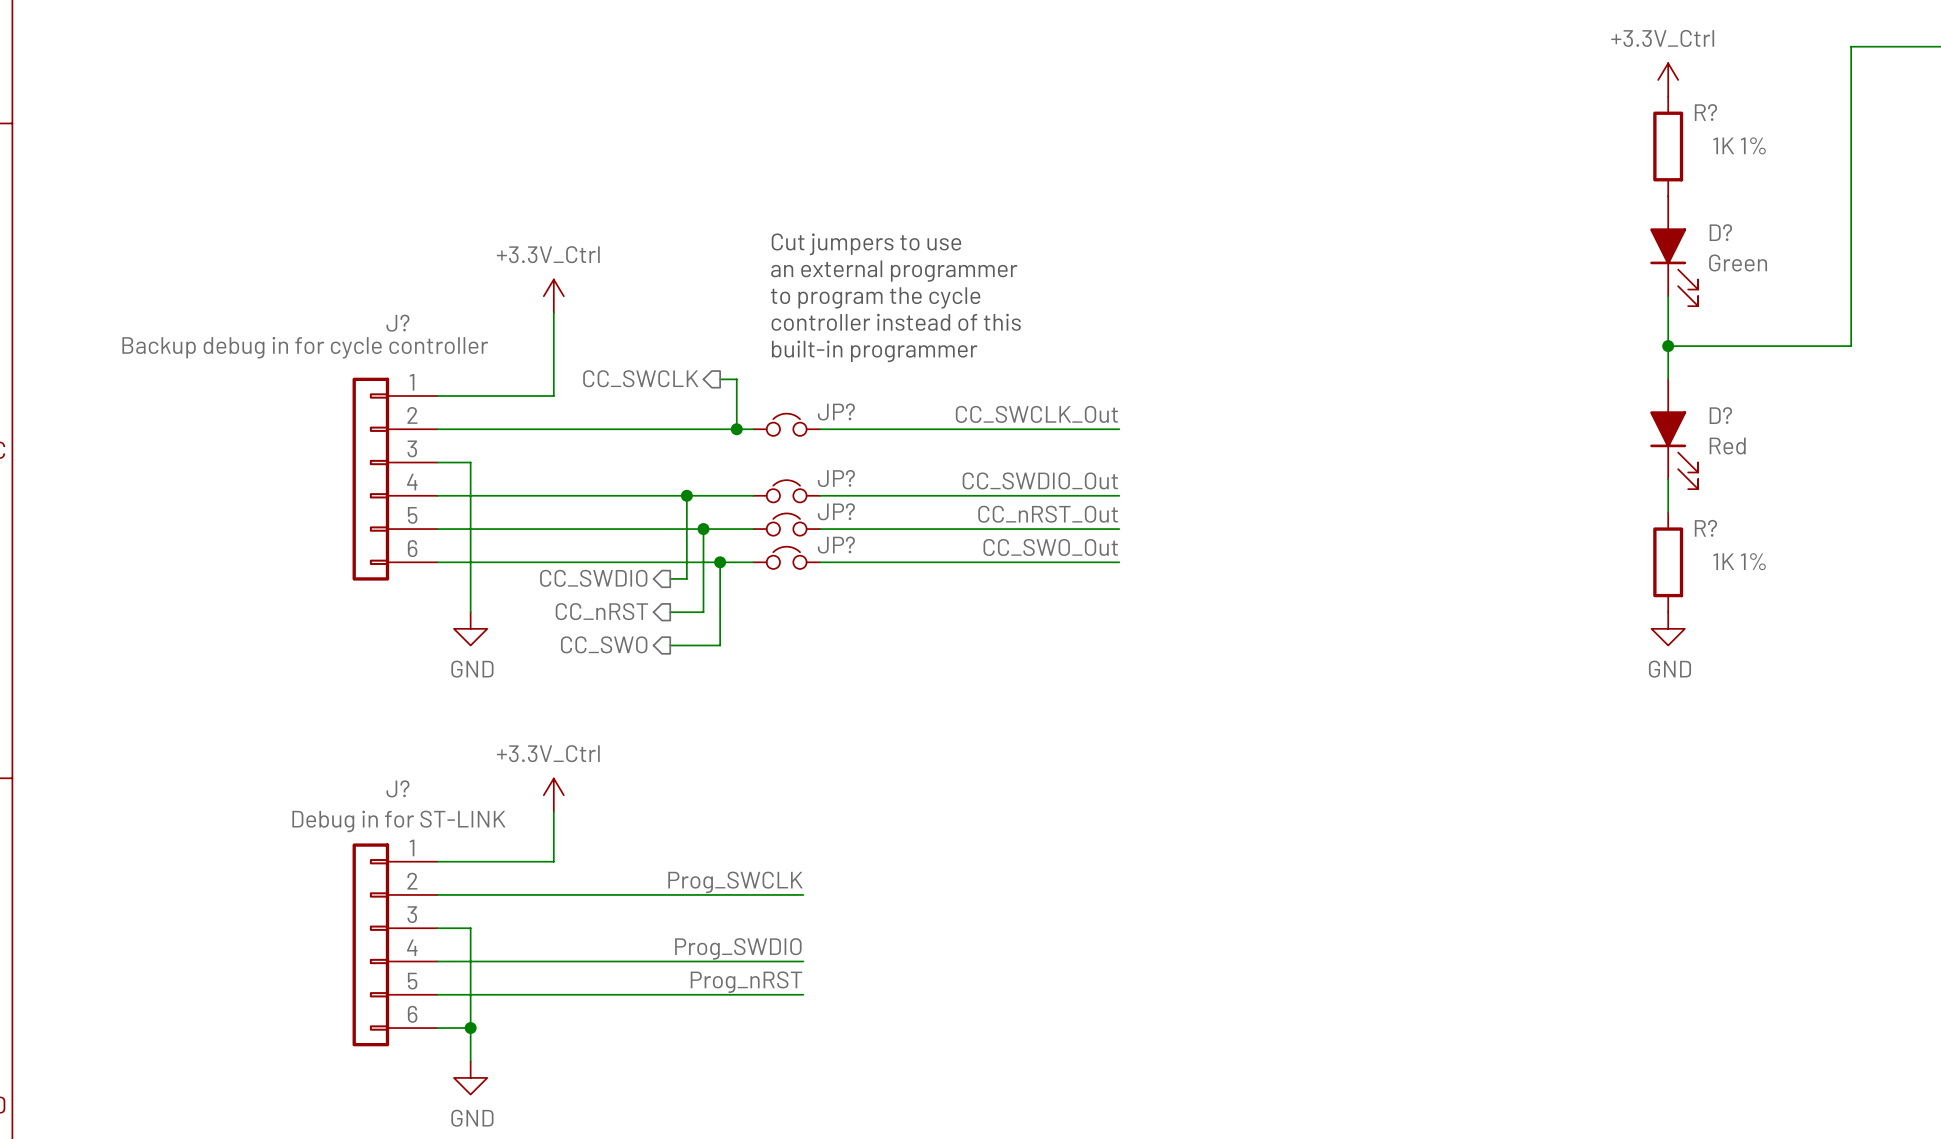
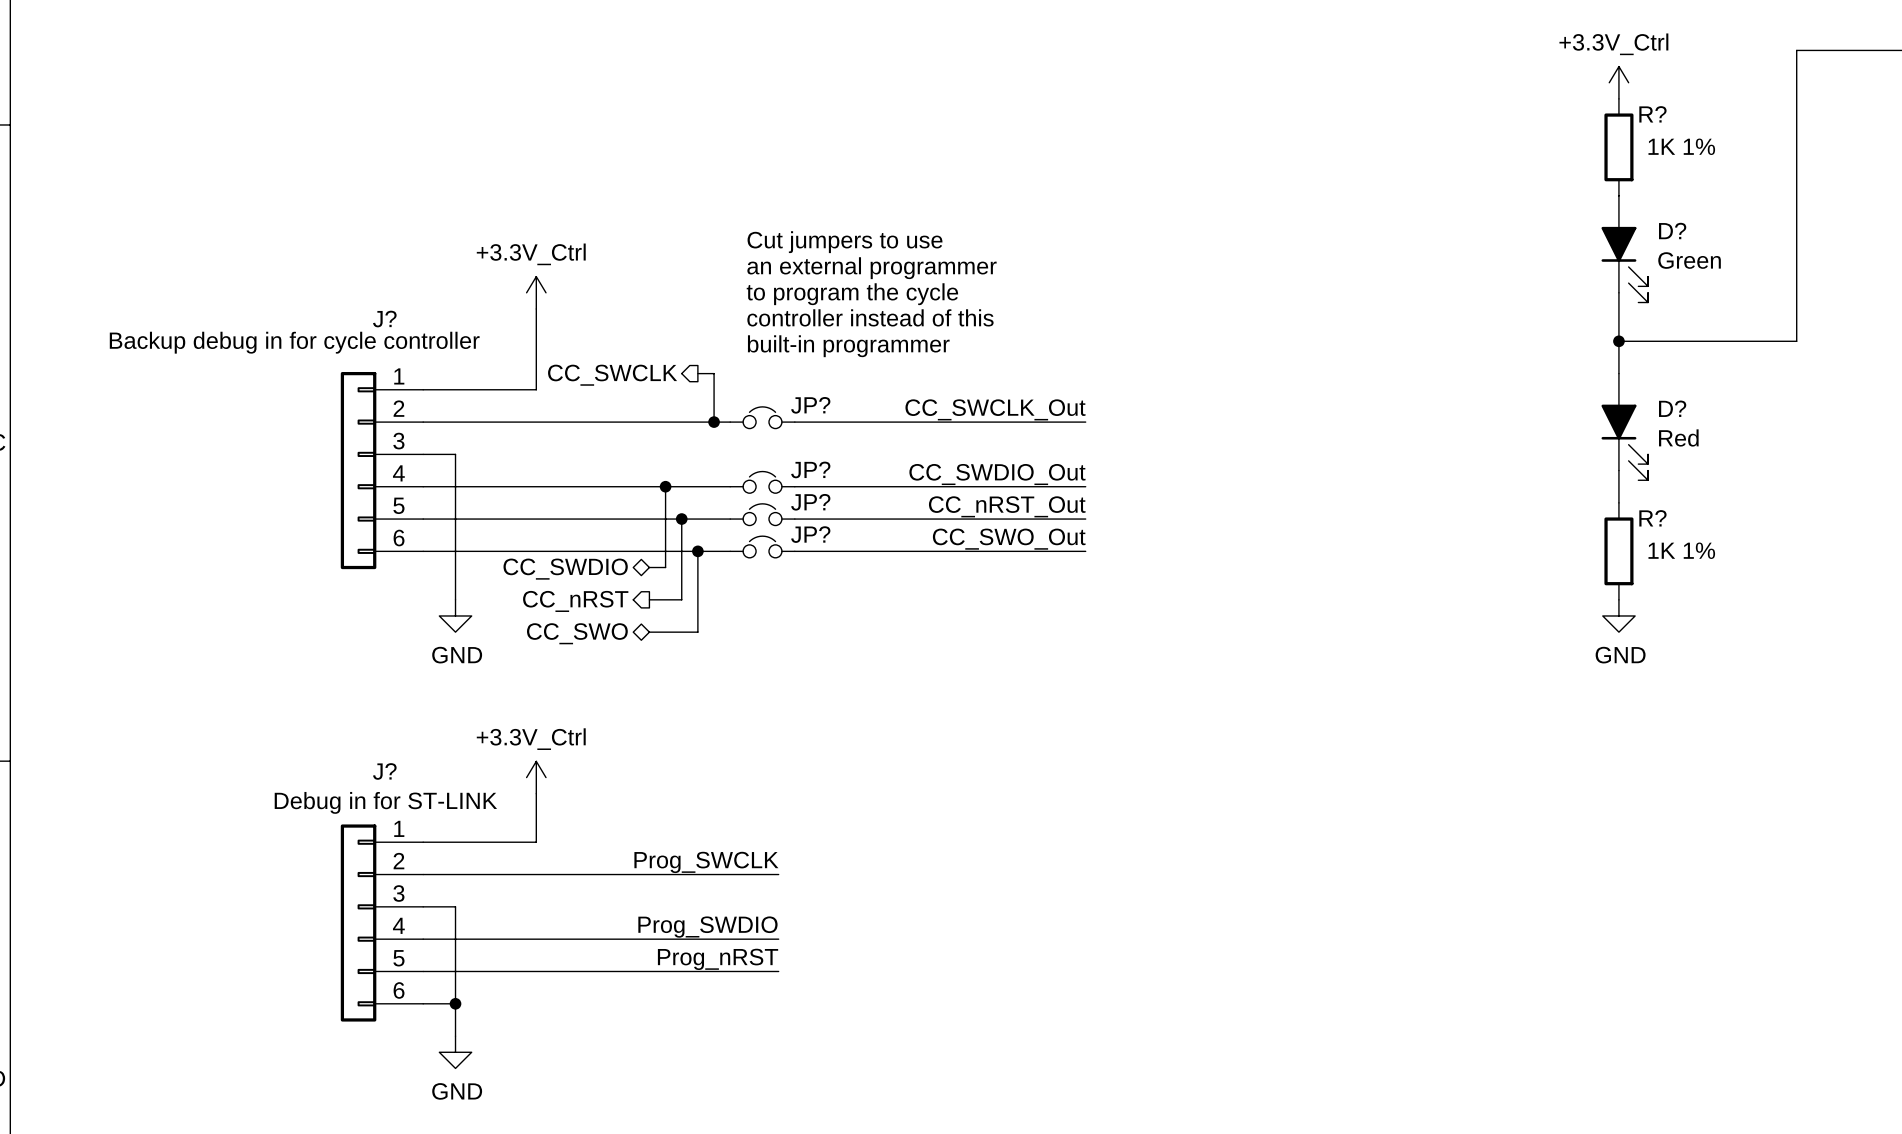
hierarchical label shape: output (593, 578) -> bidirectional (565, 569)
hierarchical label shape: output (604, 644) -> bidirectional (577, 633)

